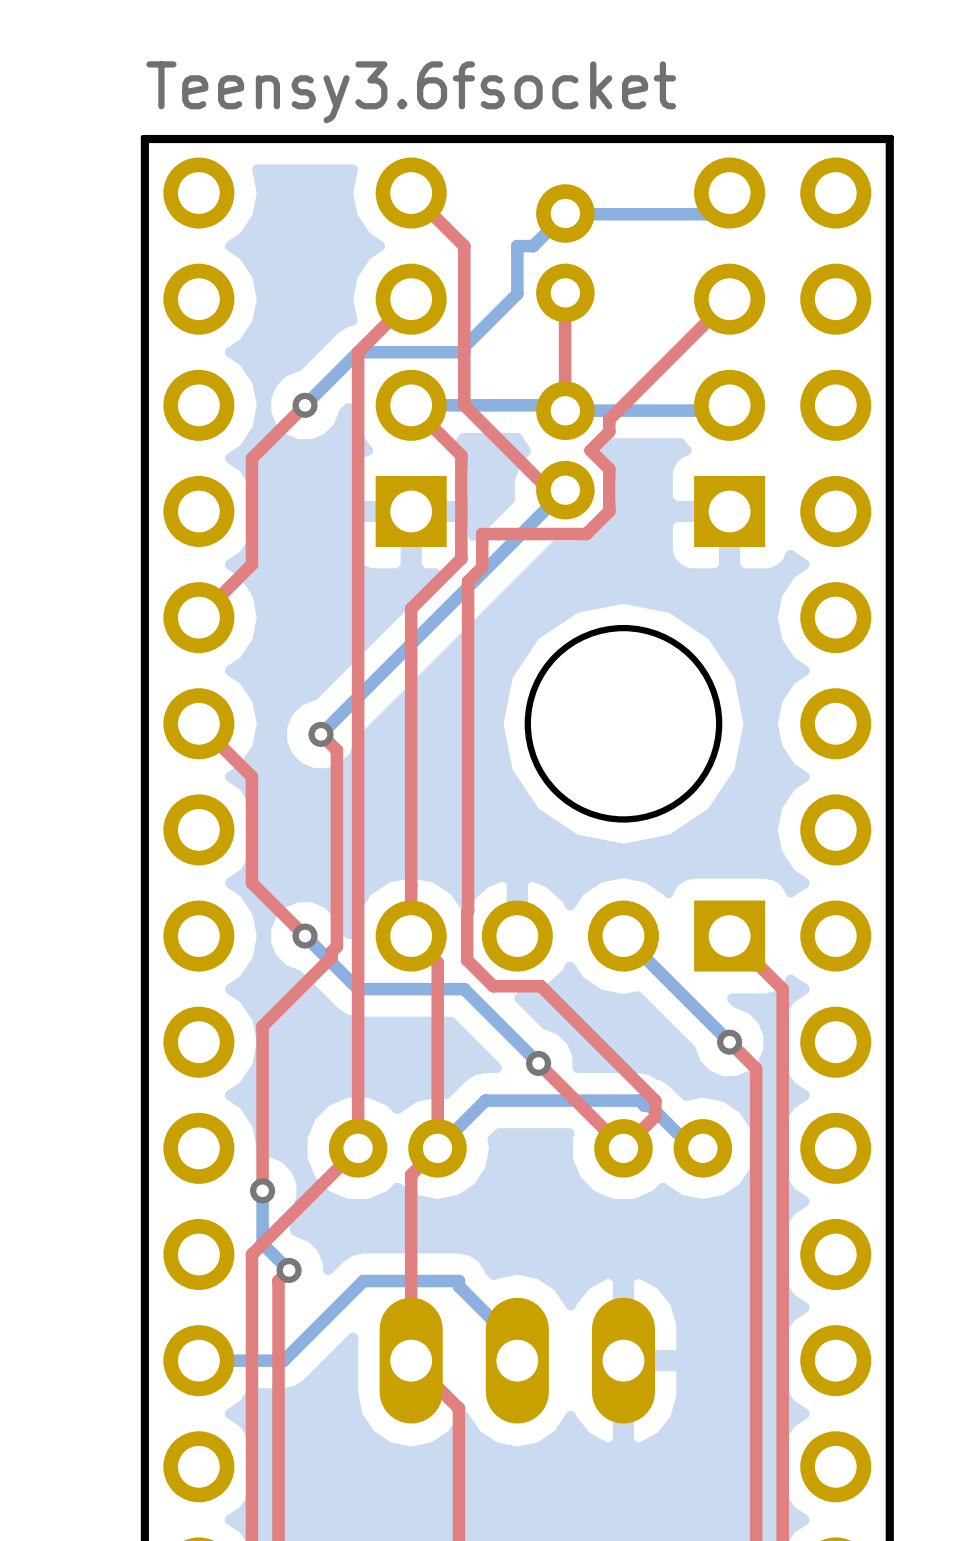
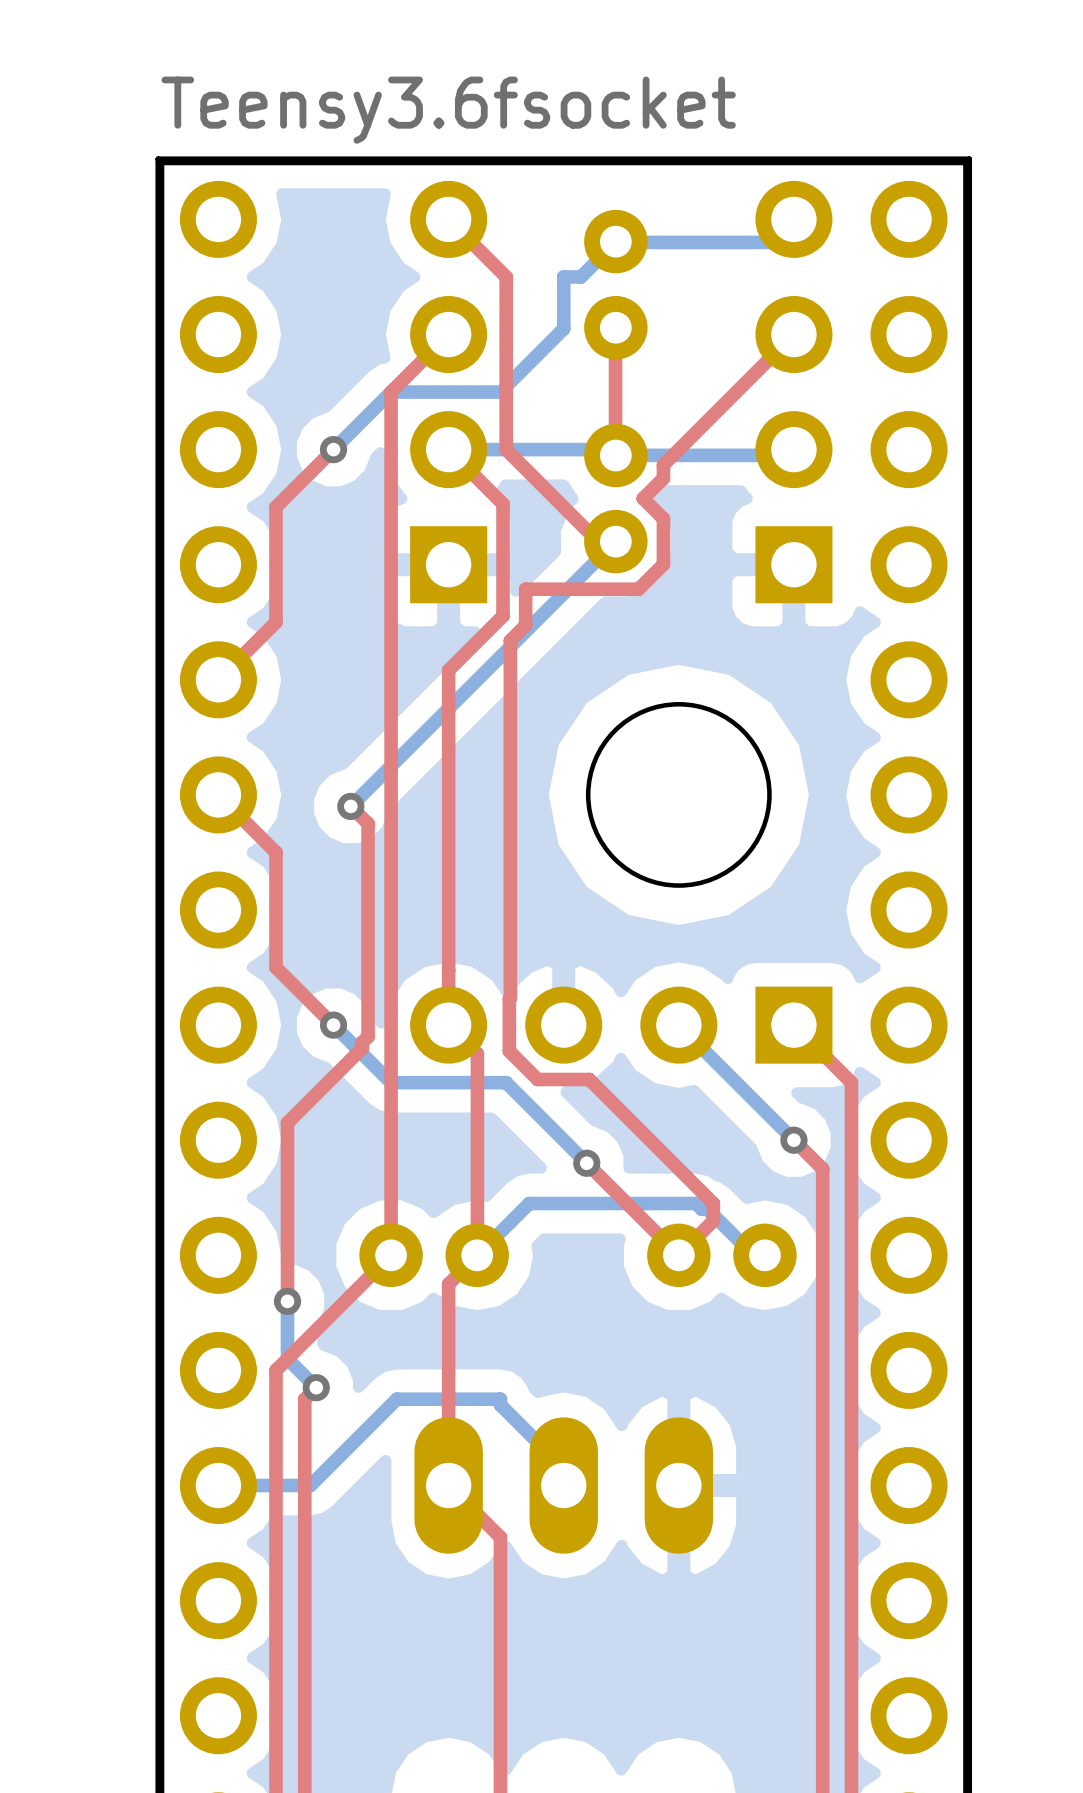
round board edge size: [524, 624, 723, 823] -> [585, 702, 772, 888]

